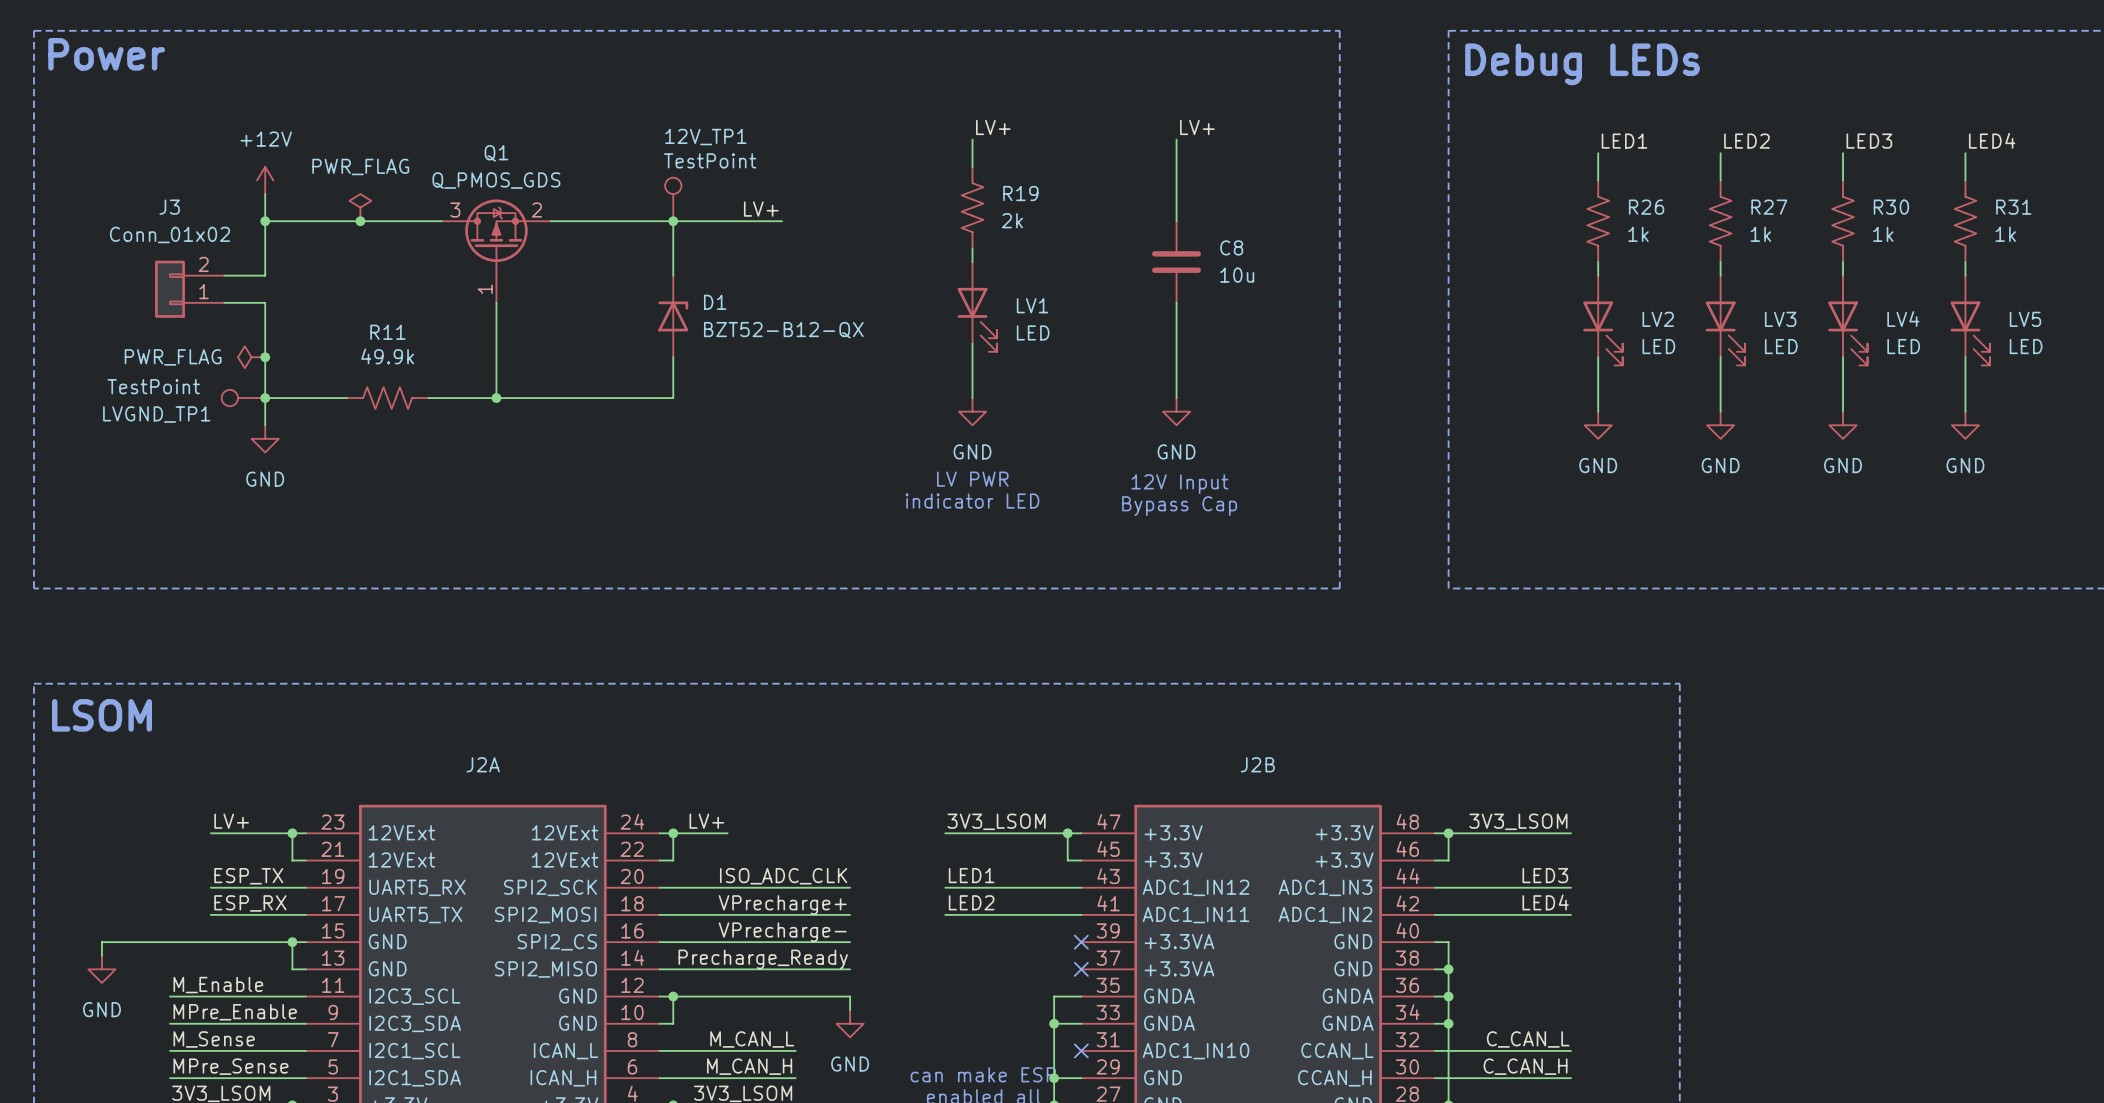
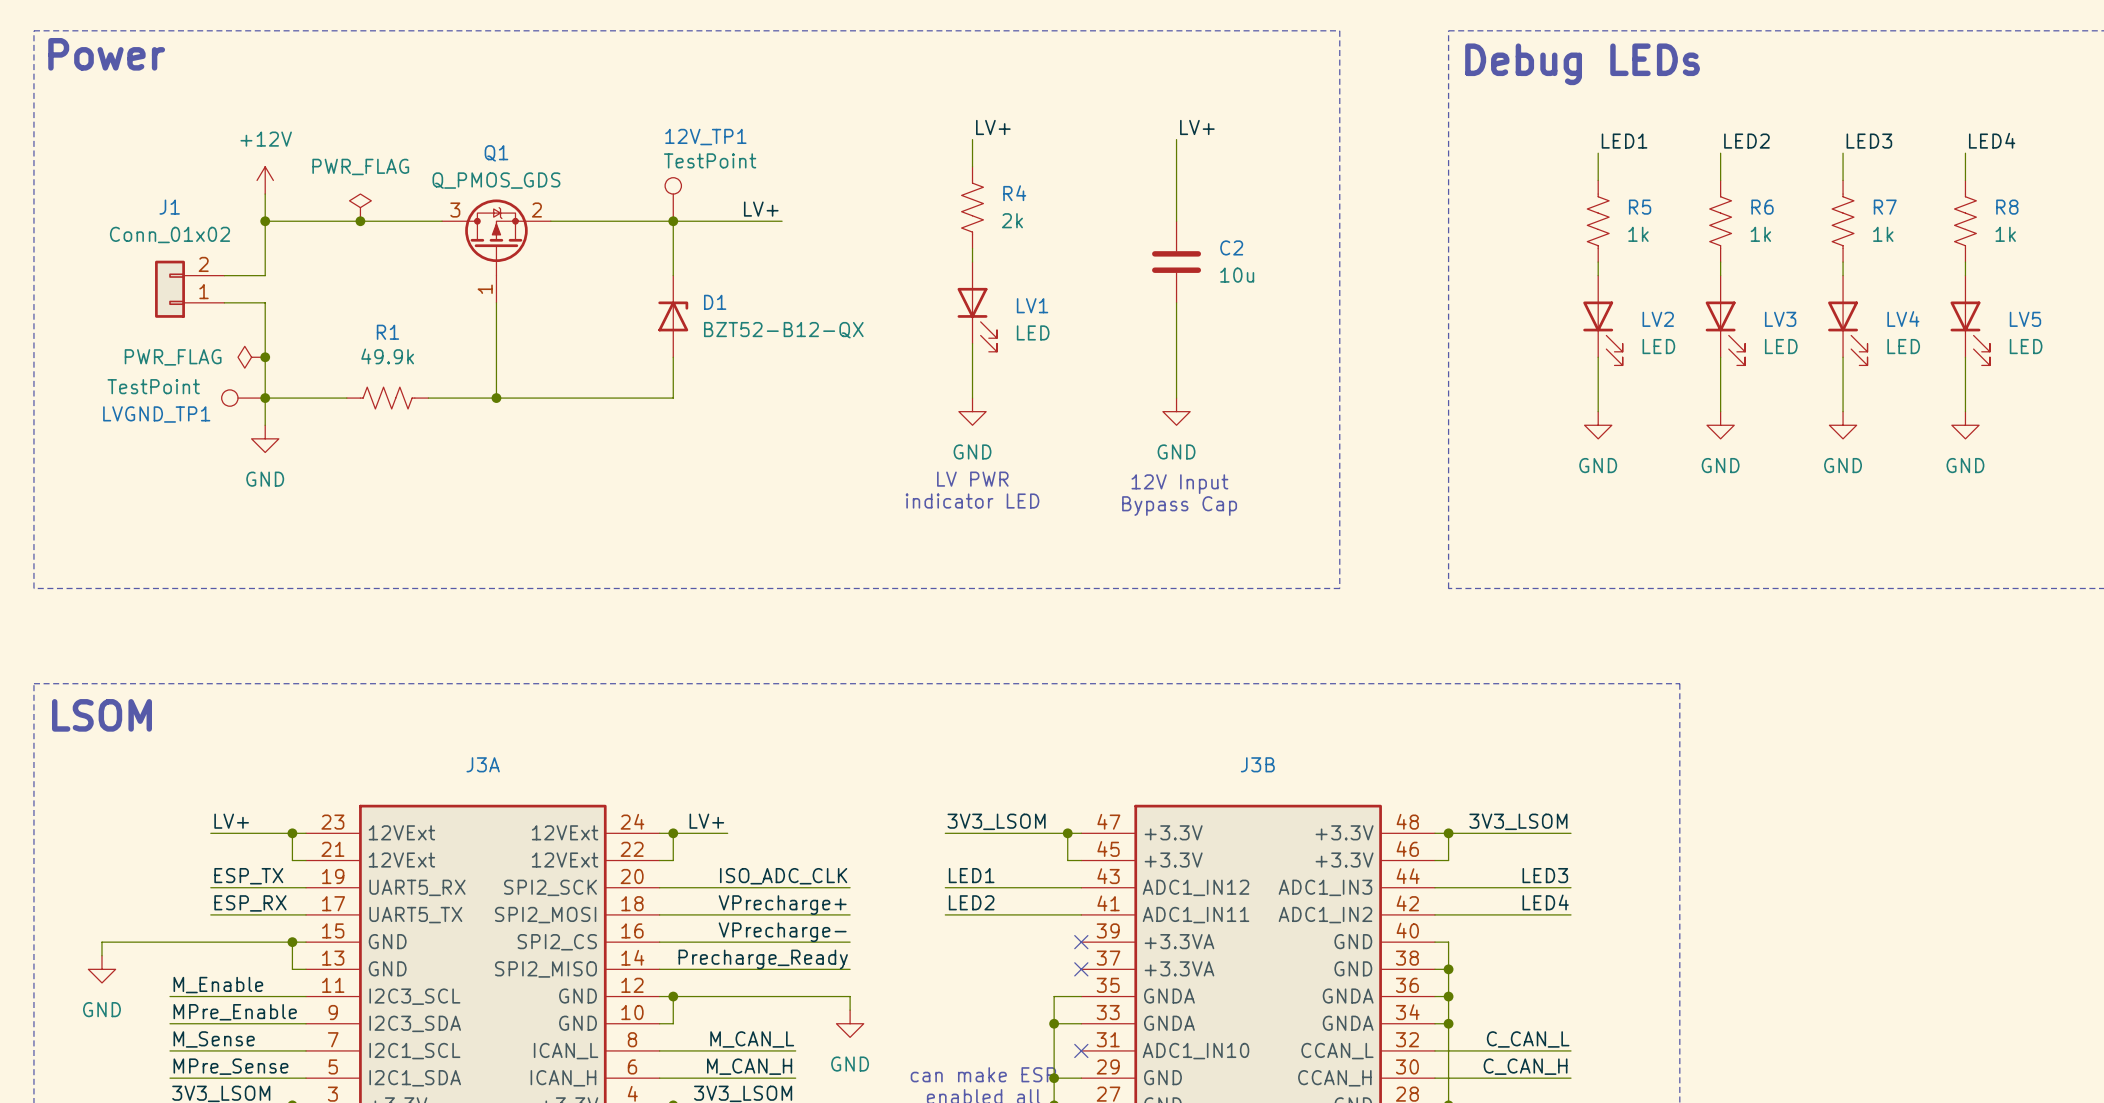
R19 name: R19 (1020, 193) -> R4 (1014, 193)
J3 name: J3 (169, 207) -> J1 (169, 207)
R26 name: R26 (1646, 207) -> R5 (1640, 207)
R27 name: R27 (1769, 207) -> R6 (1762, 207)
R30 name: R30 (1891, 207) -> R7 (1885, 207)
R31 name: R31 (2013, 207) -> R8 (2007, 207)
C8 name: C8 (1231, 247) -> C2 (1231, 247)
R11 name: R11 (387, 332) -> R1 (387, 332)
J2A name: J2A (483, 764) -> J3A (483, 764)
J2B name: J2B (1257, 764) -> J3B (1257, 764)

